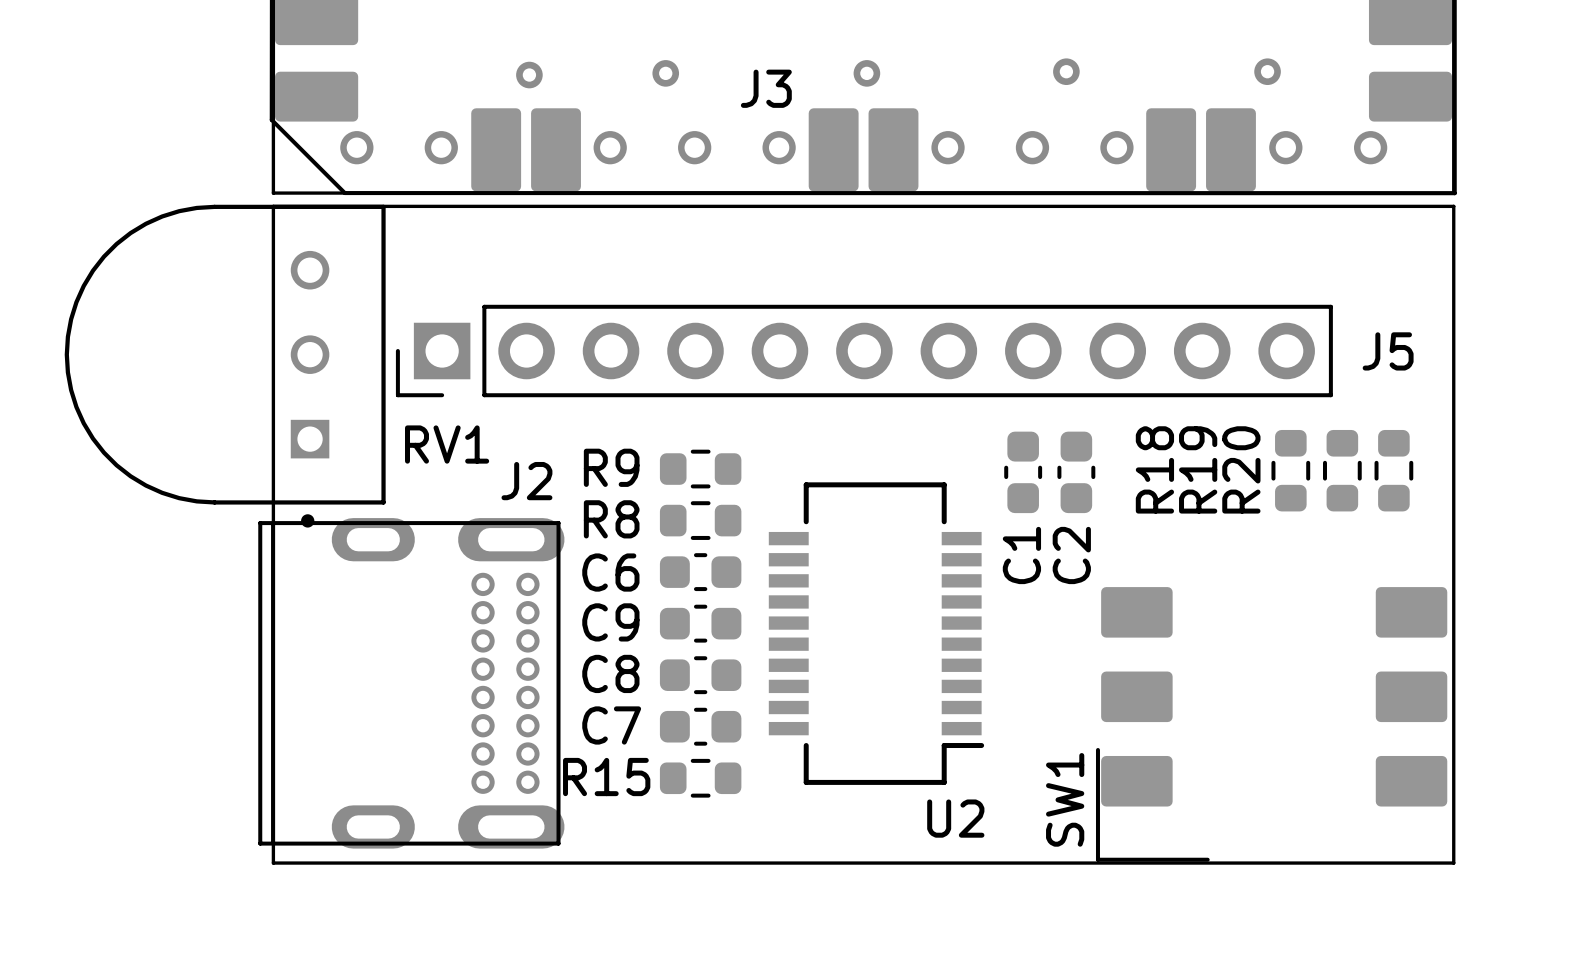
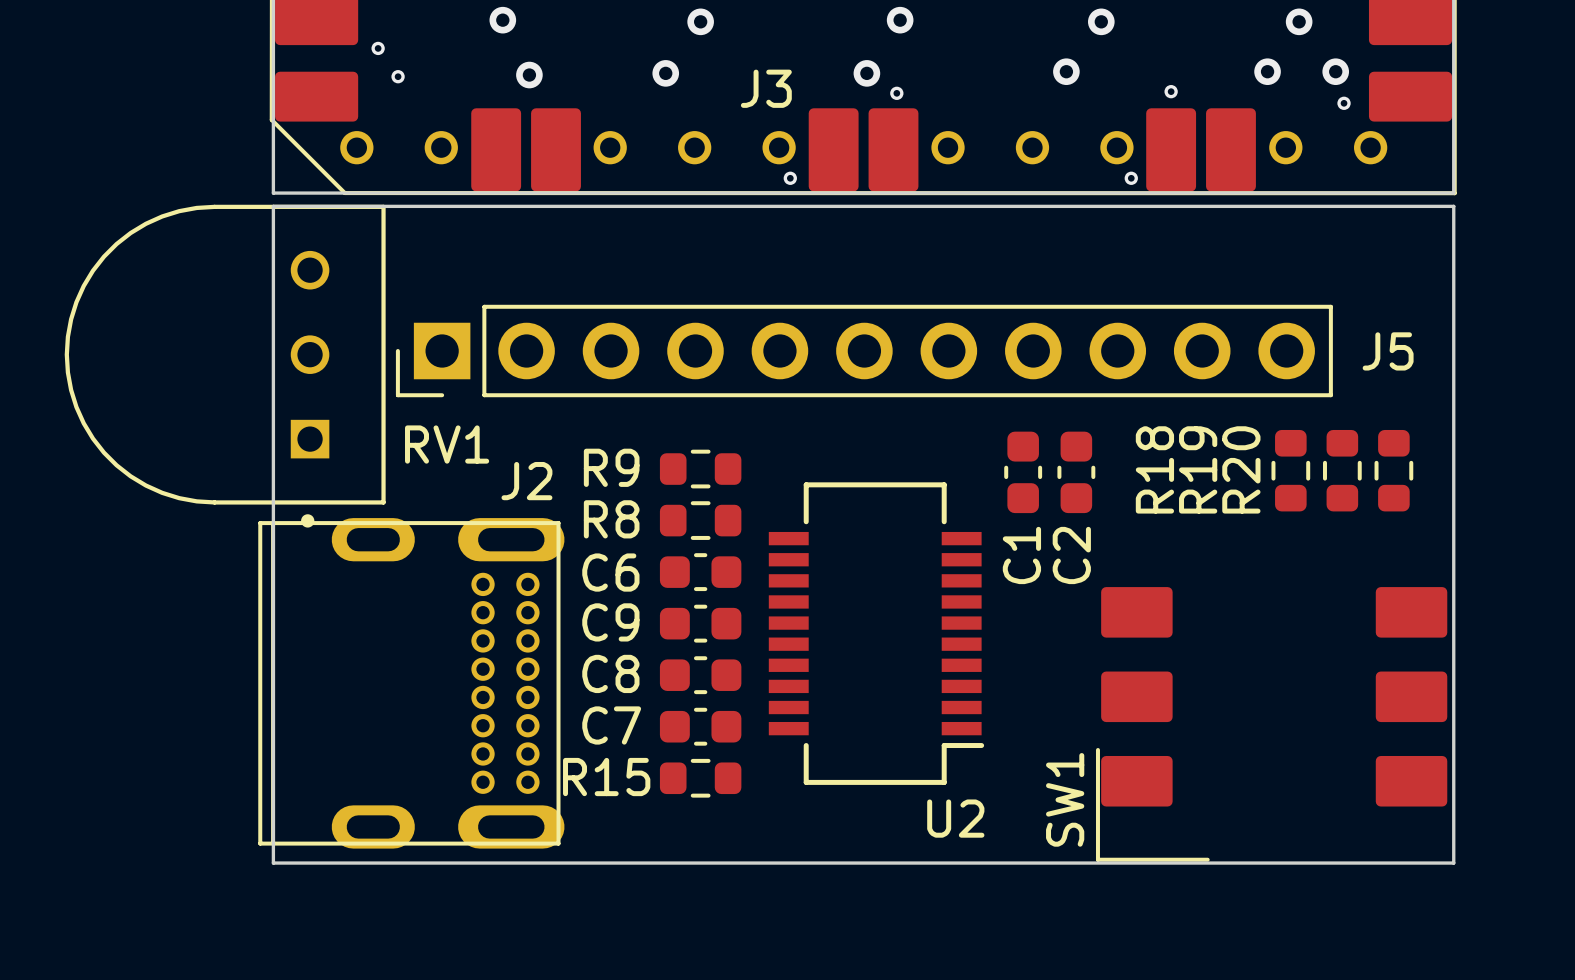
via: none -> (502, 20)
via: none -> (900, 20)
via: none -> (700, 21)
via: none -> (1101, 21)
via: none -> (1299, 21)
via: none -> (378, 48)
via: none -> (1335, 71)
via: none -> (398, 76)
via: none -> (1171, 91)
via: none -> (896, 93)
via: none -> (1344, 103)
via: none -> (790, 178)
via: none -> (1131, 178)

